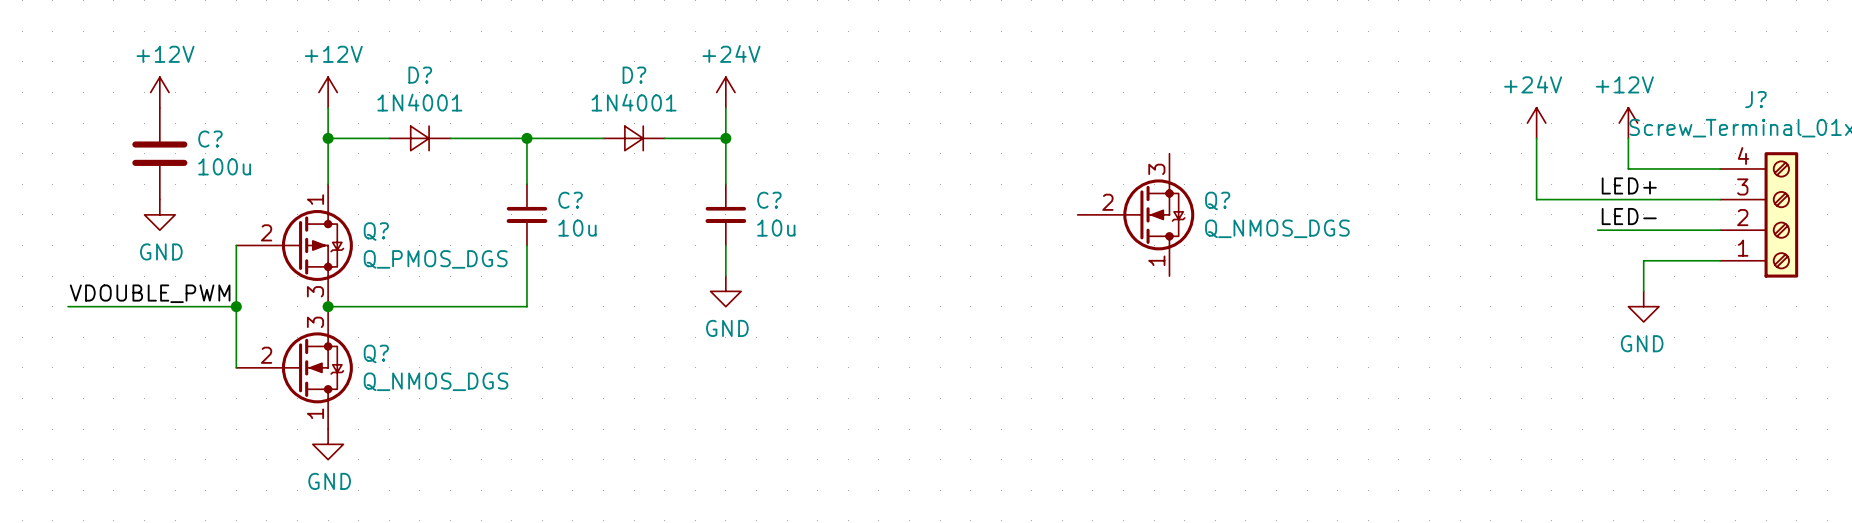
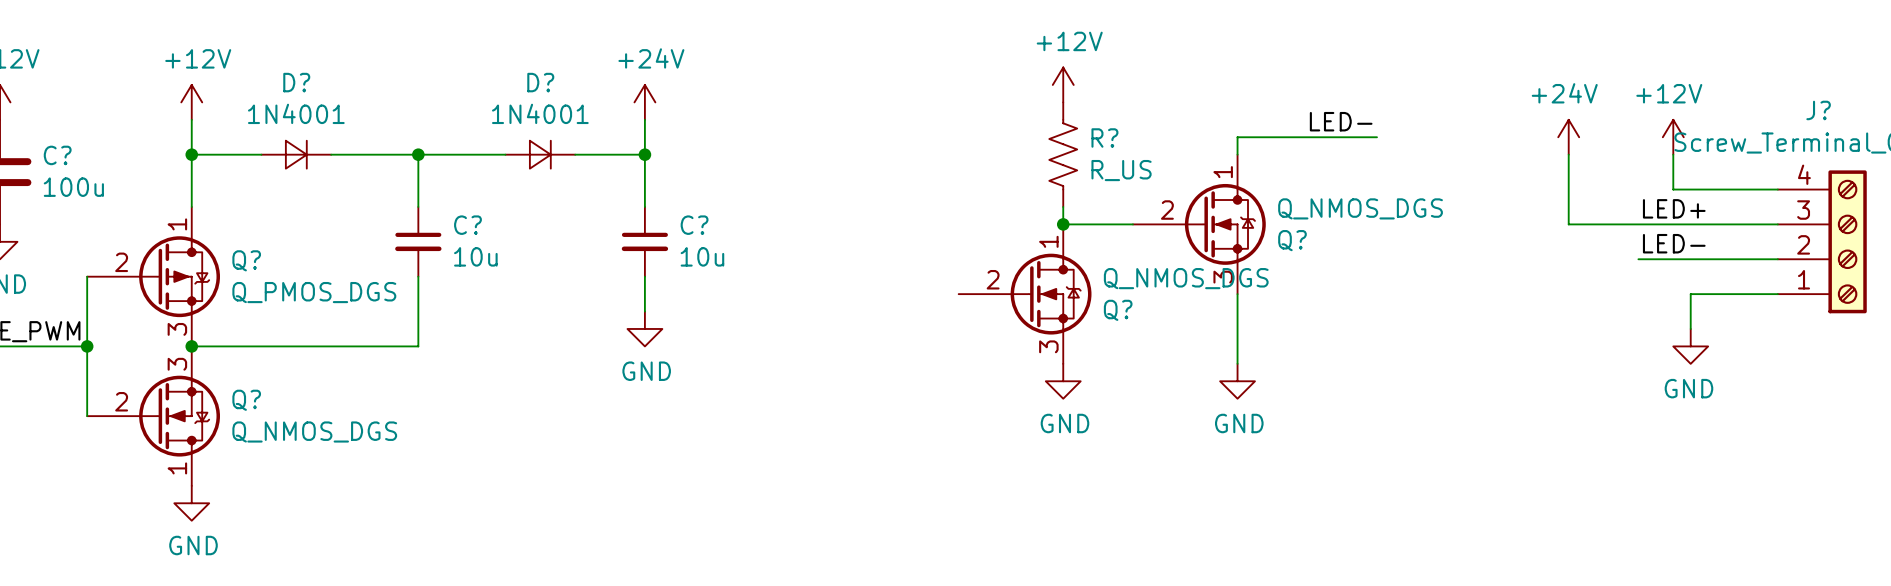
power symbol: none -> +12V (1063, 84)
label: none -> LED- (1341, 121)
wire: none -> (1376, 137) (1237, 137) (1237, 154)
R?: none -> R_US (1063, 154)
wire: none -> (1063, 206) (1063, 224) (1132, 224)
junction: none -> (1063, 224)
Q?: none -> Q_NMOS_DGS (1199, 224)
Q?: Q_NMOS_DGS (1135, 214) -> none
Q?: none -> Q_NMOS_DGS (1025, 294)
wire: none -> (1237, 294) (1237, 363)
power symbol: none -> GND (1063, 381)
power symbol: none -> GND (1237, 381)

